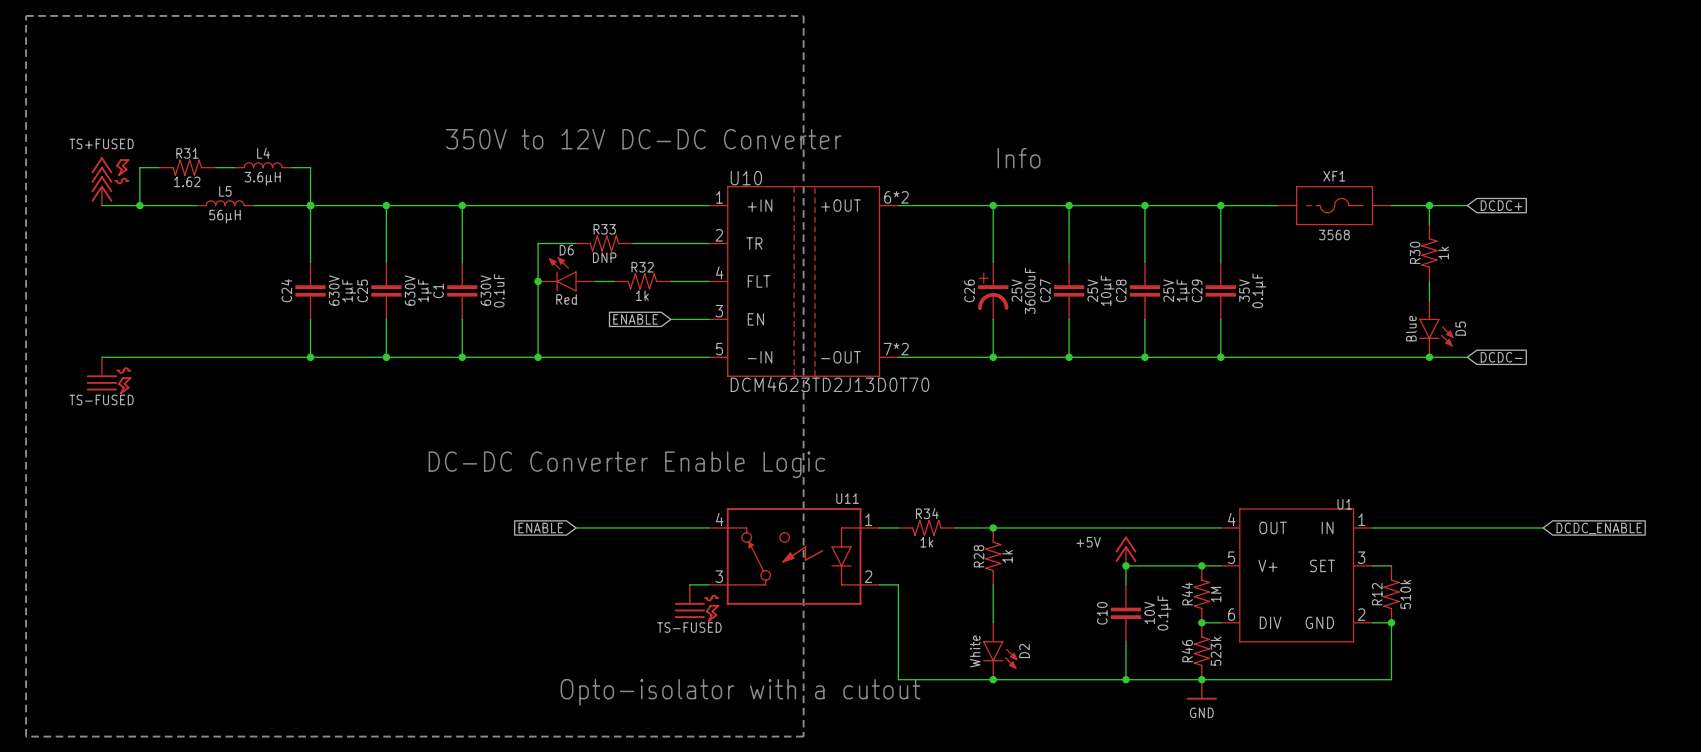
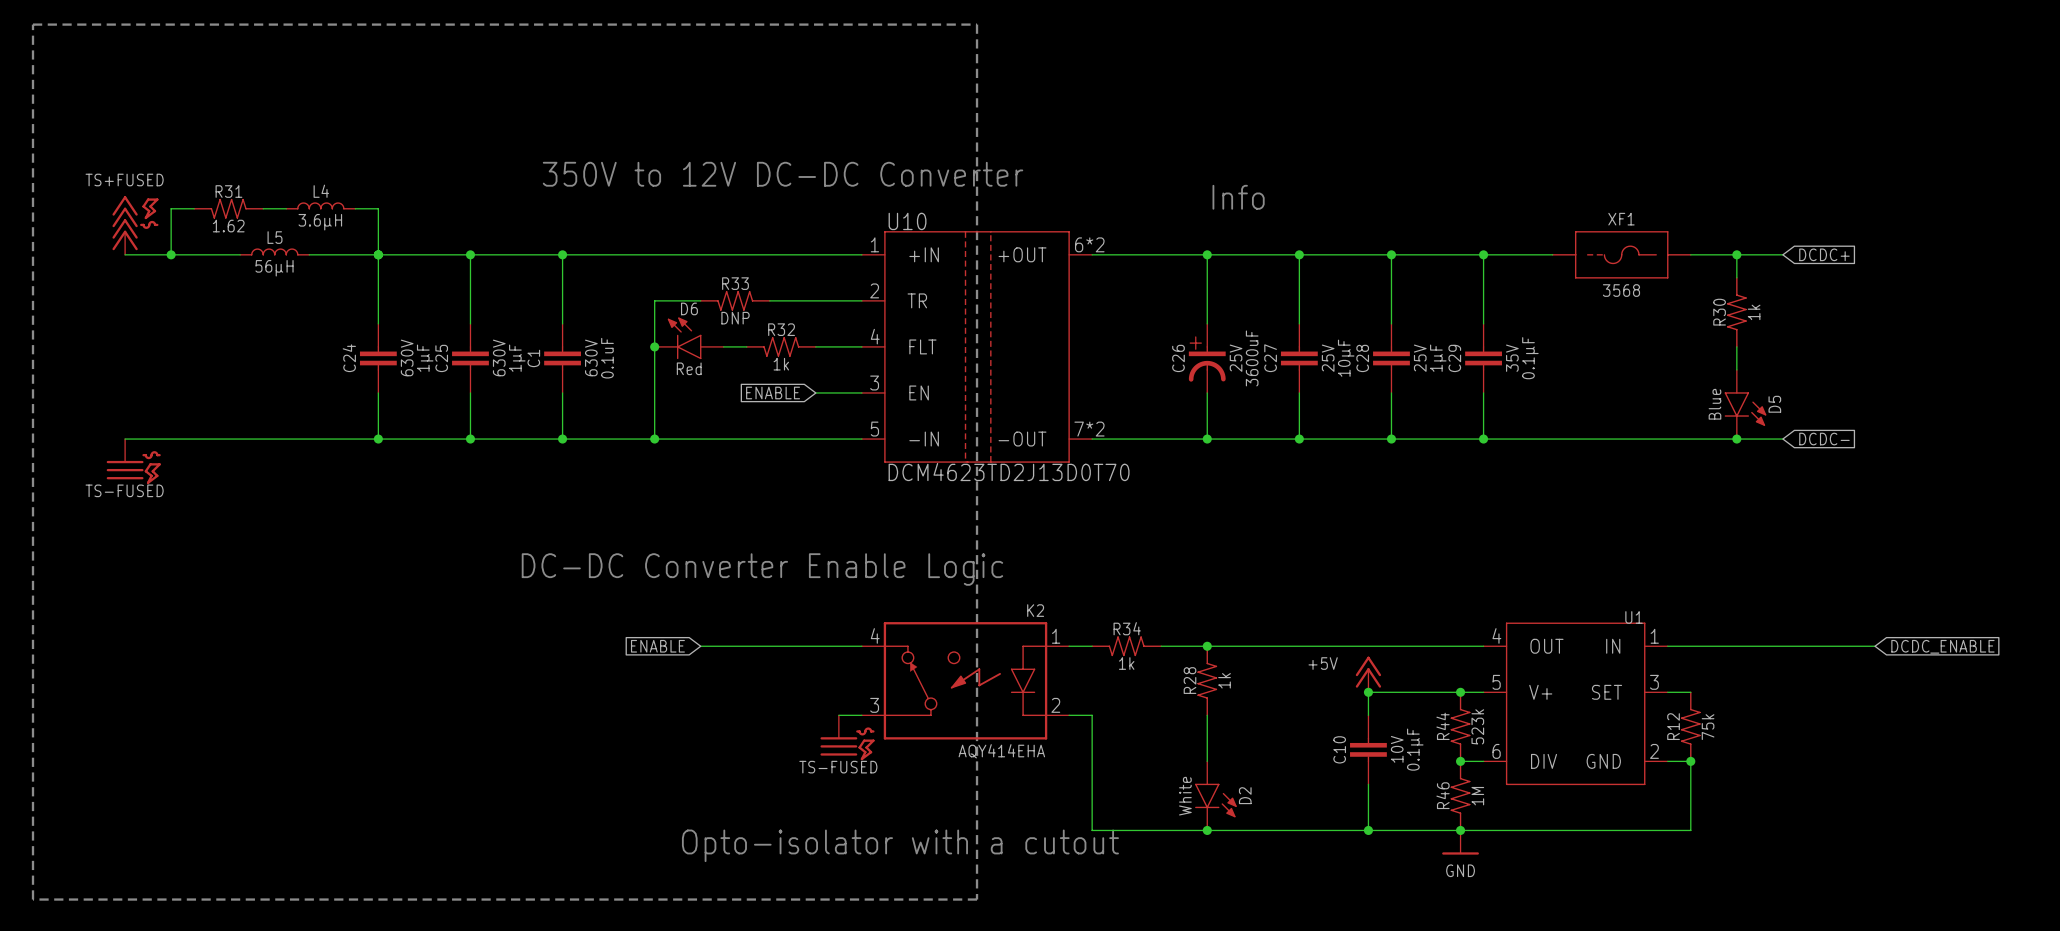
U11 name: U11 (847, 498) -> K2 (1035, 610)
R44 text: 1M (1216, 594) -> 523k (1477, 726)
R12 text: 510k (1405, 594) -> 75k (1708, 727)
U11 text: none -> AQY414EHA (1001, 751)
R46 text: 523k (1216, 651) -> 1M (1477, 796)

